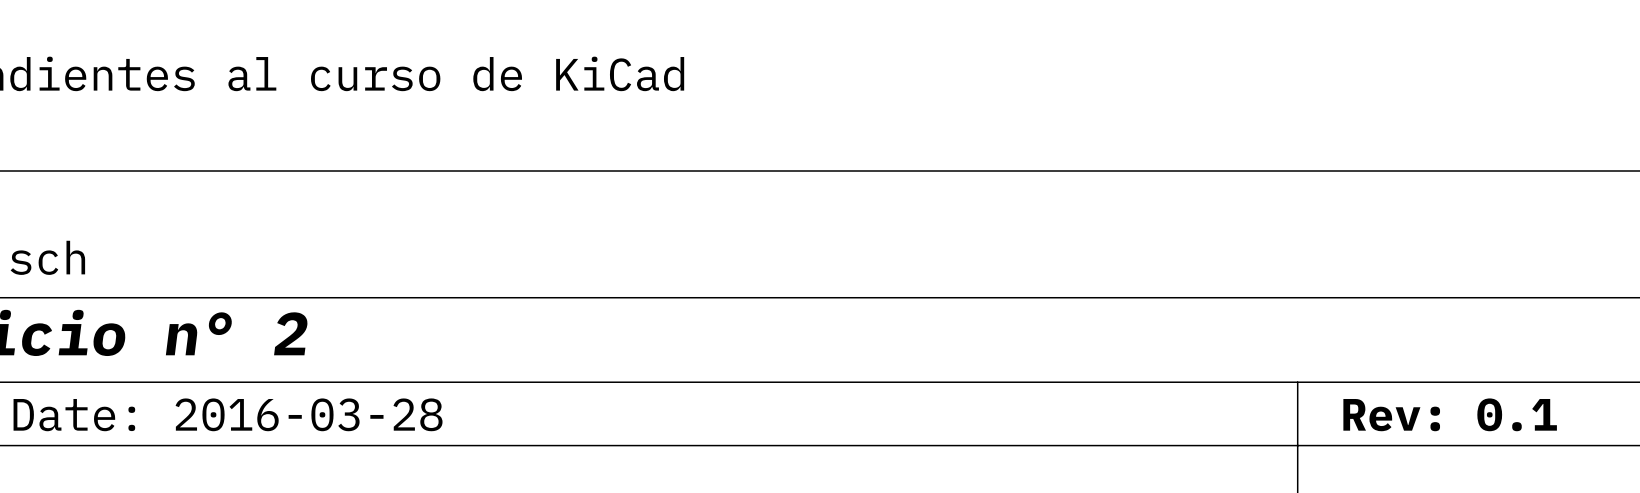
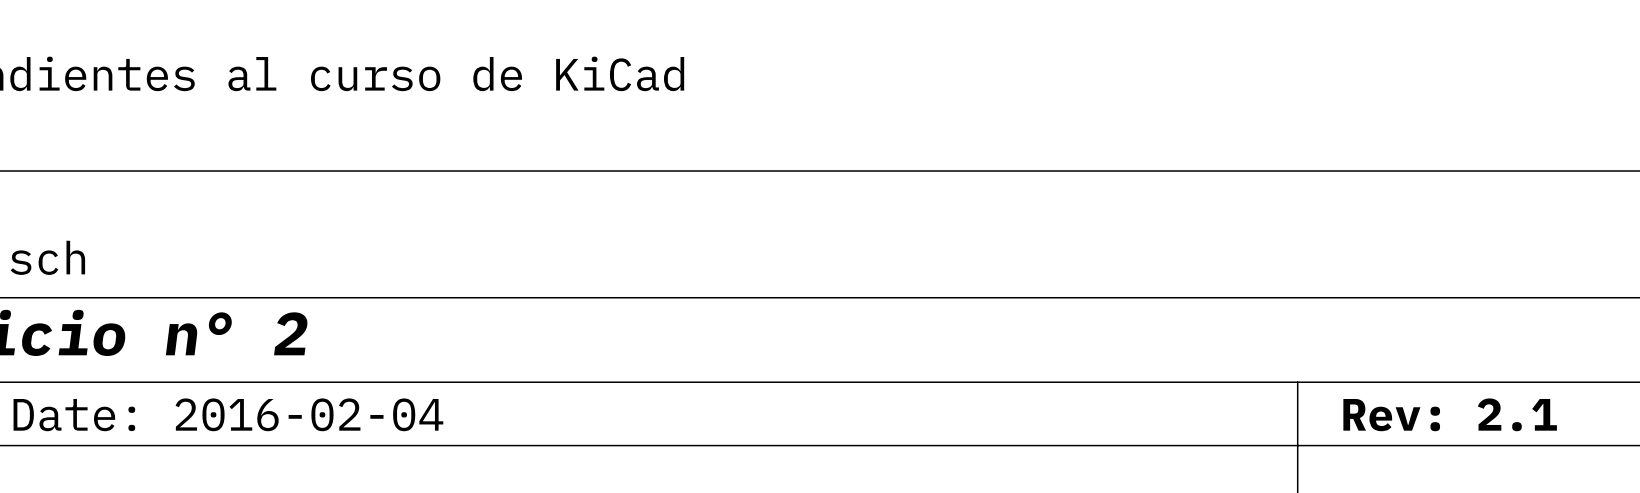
title block: Date: 2016-03-28 (228, 414) -> Date: 2016-02-04 (228, 414)
title block: Rev: 0.1 (1450, 414) -> Rev: 2.1 (1450, 414)

